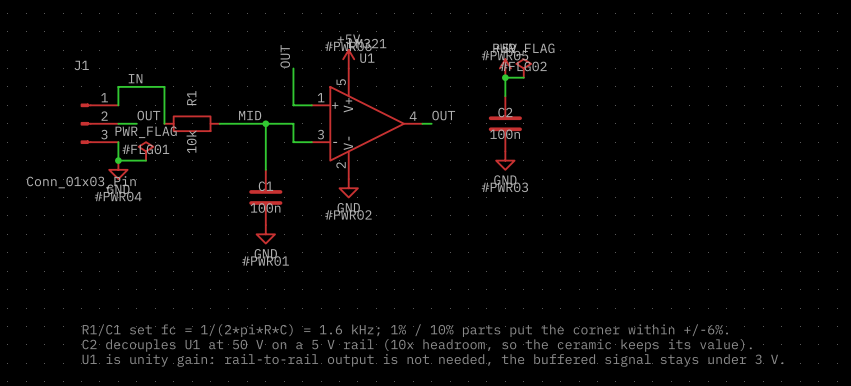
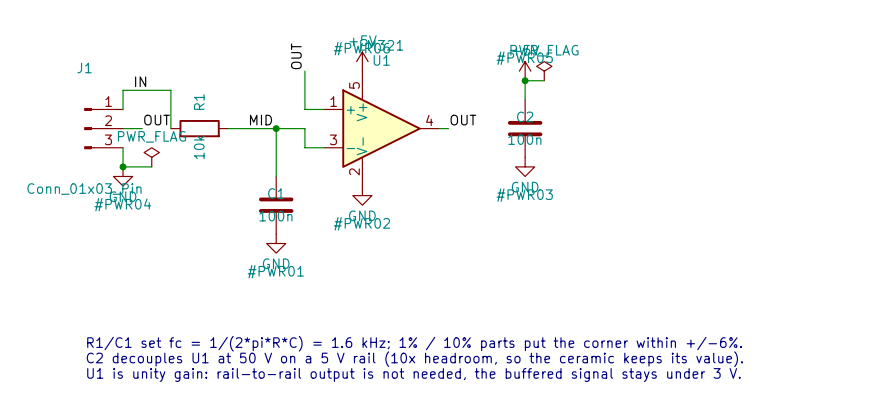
#FLG02 name: #FLG02 (523, 66) -> none
#FLG01 name: #FLG01 (145, 149) -> none

